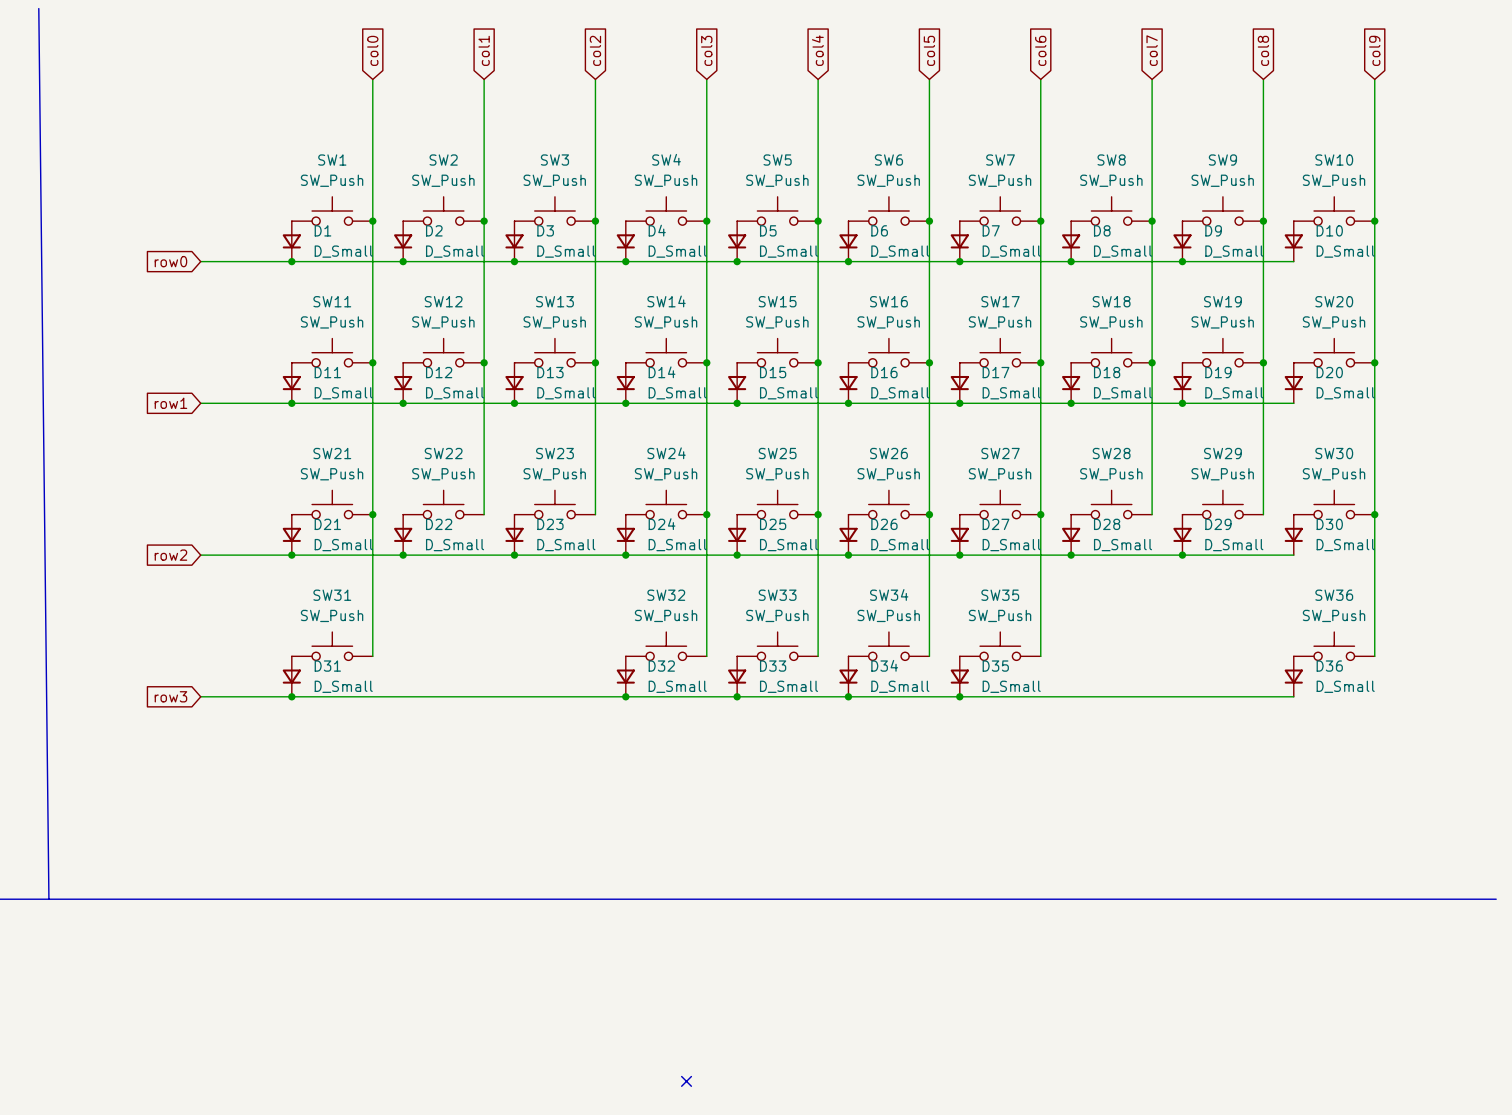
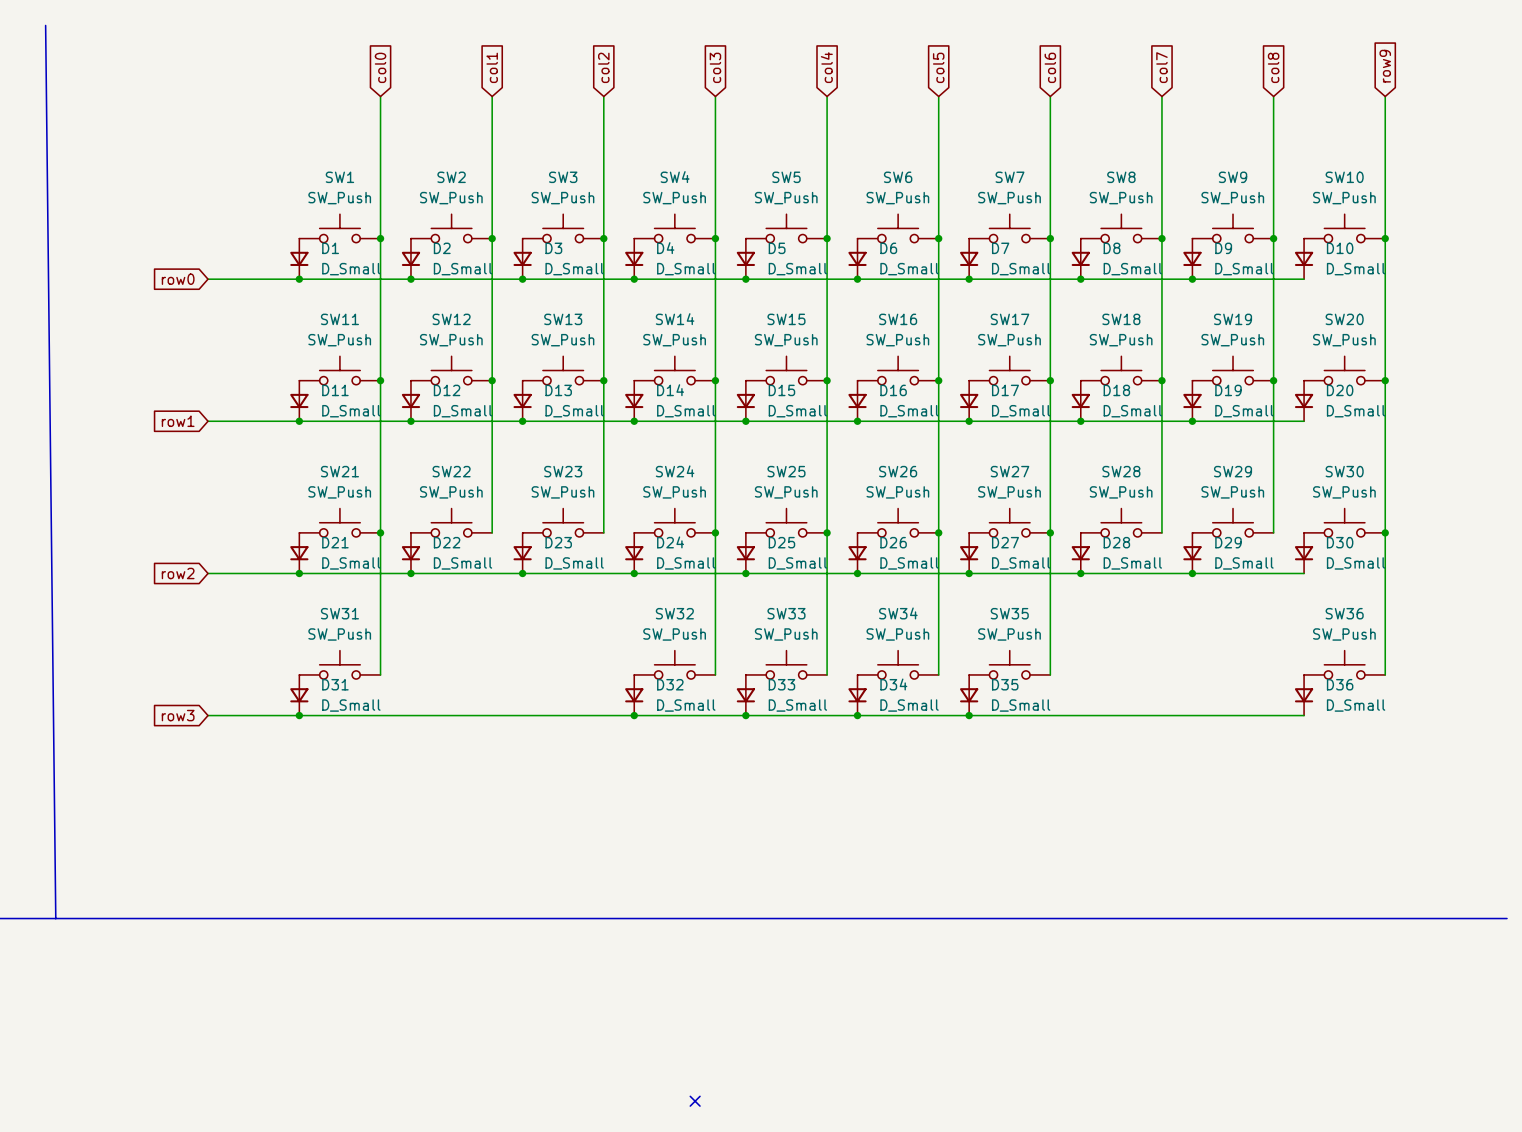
global label: col9 (1374, 50) -> row9 (1385, 66)

